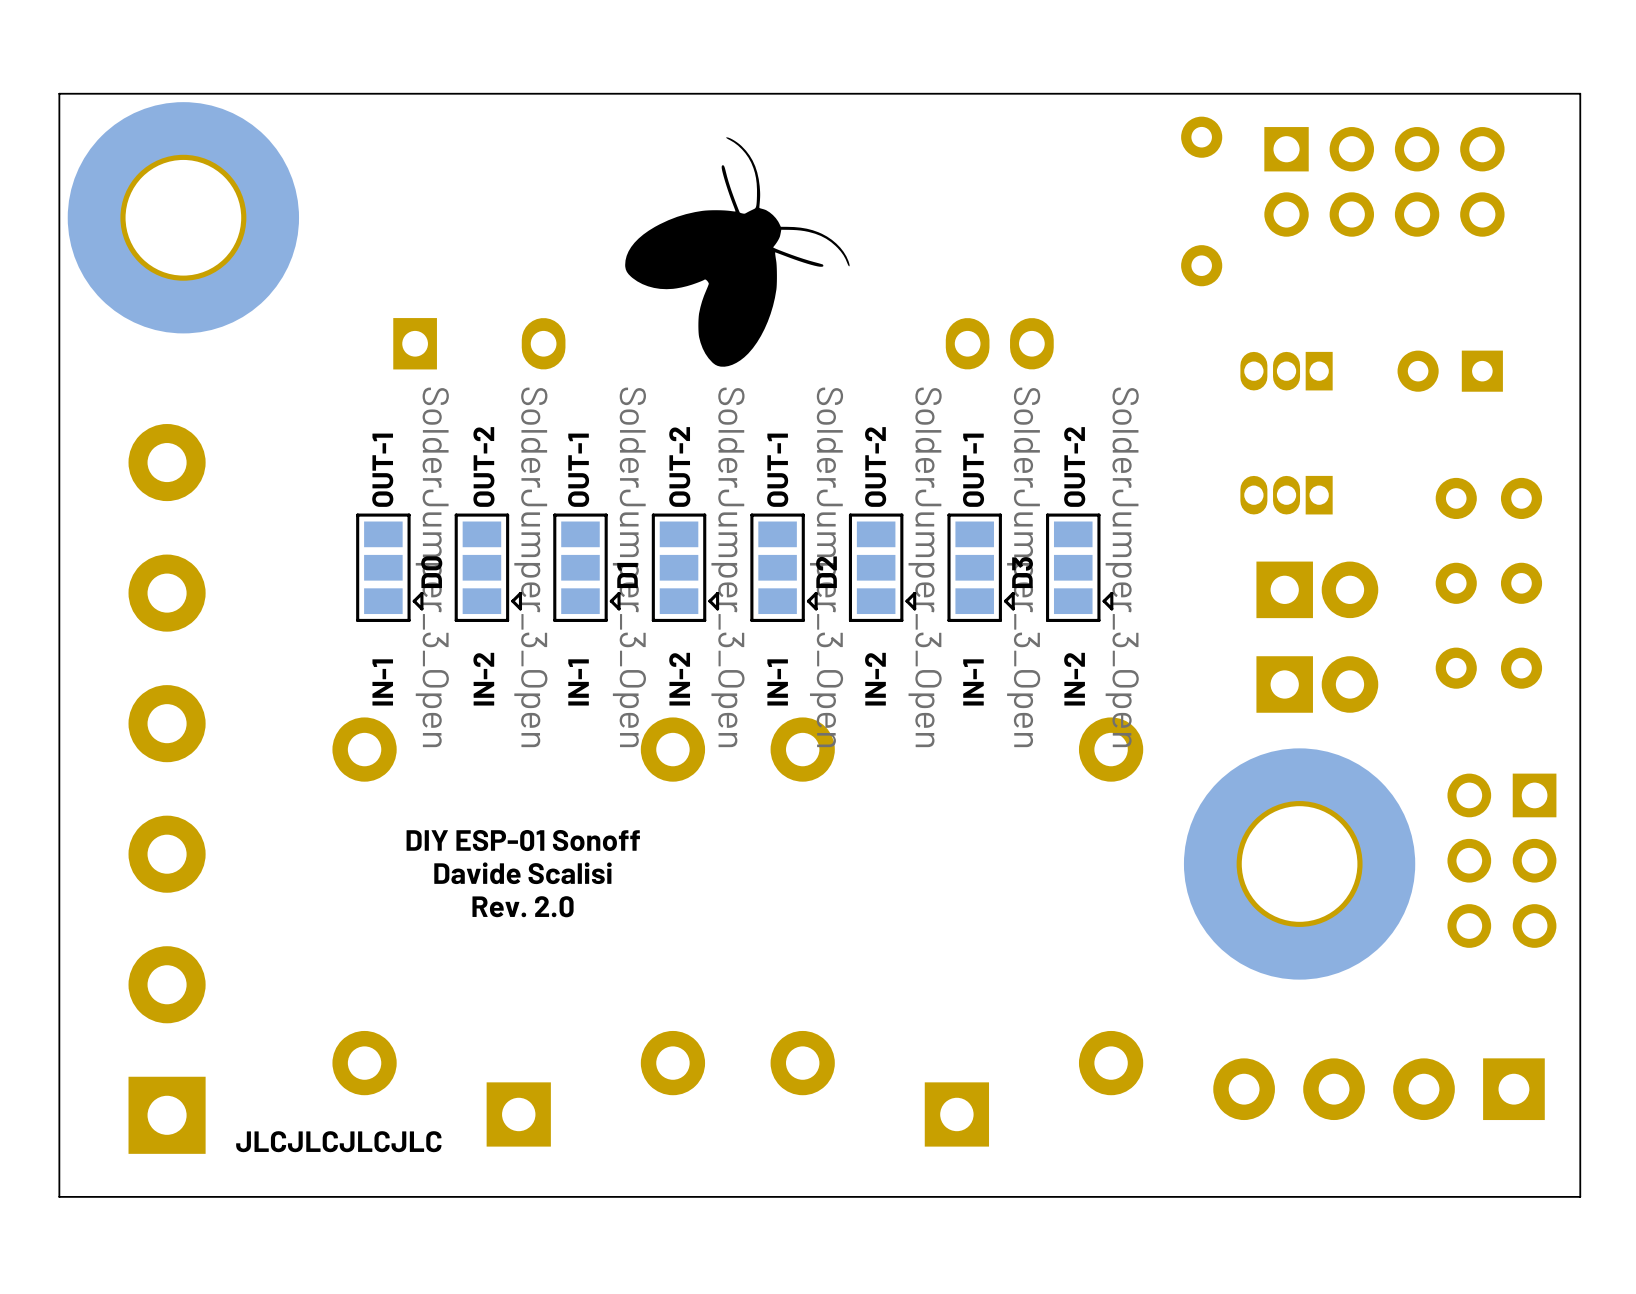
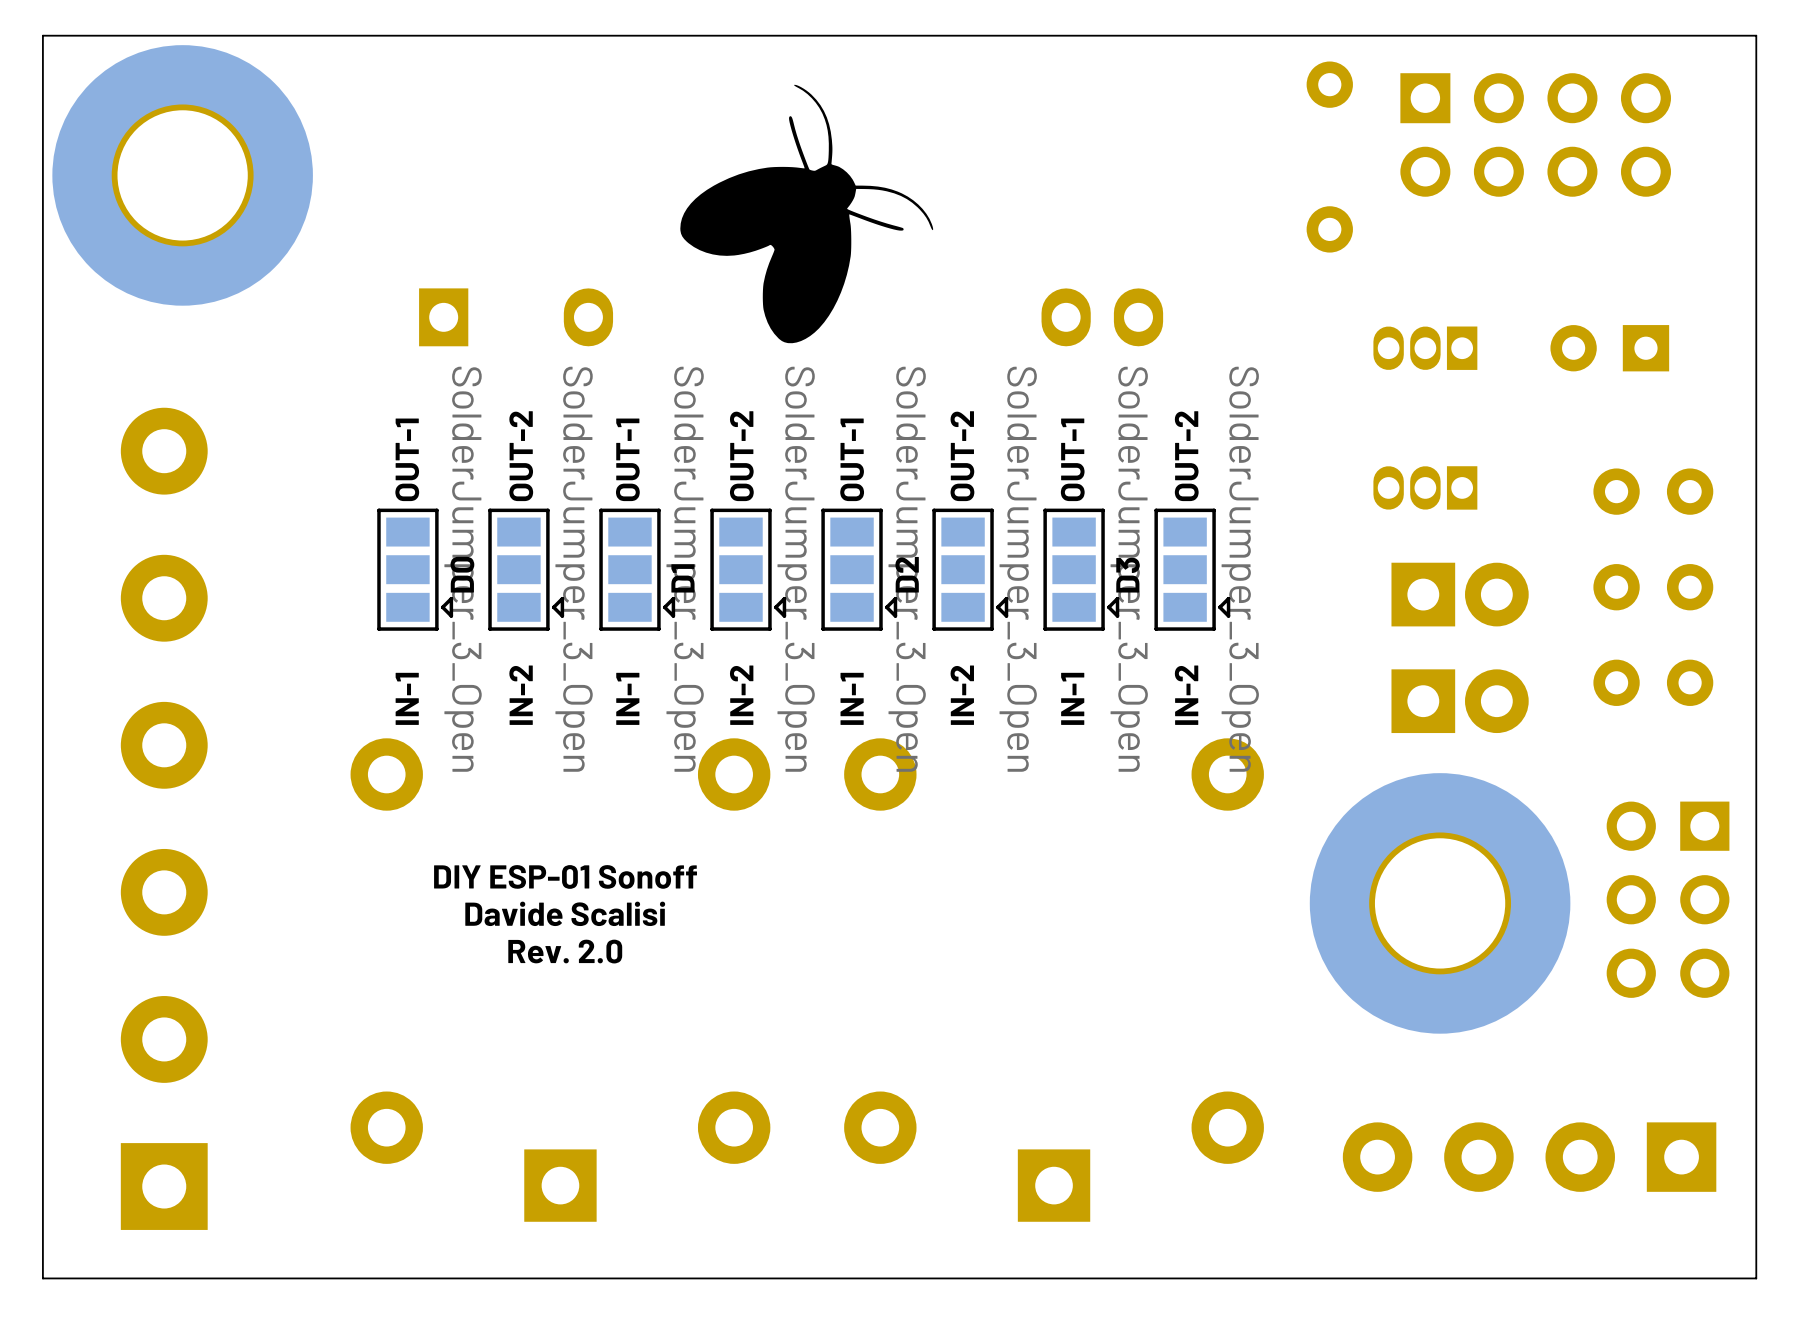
text: JLCJLCJLCJLC (338, 1141) -> none

